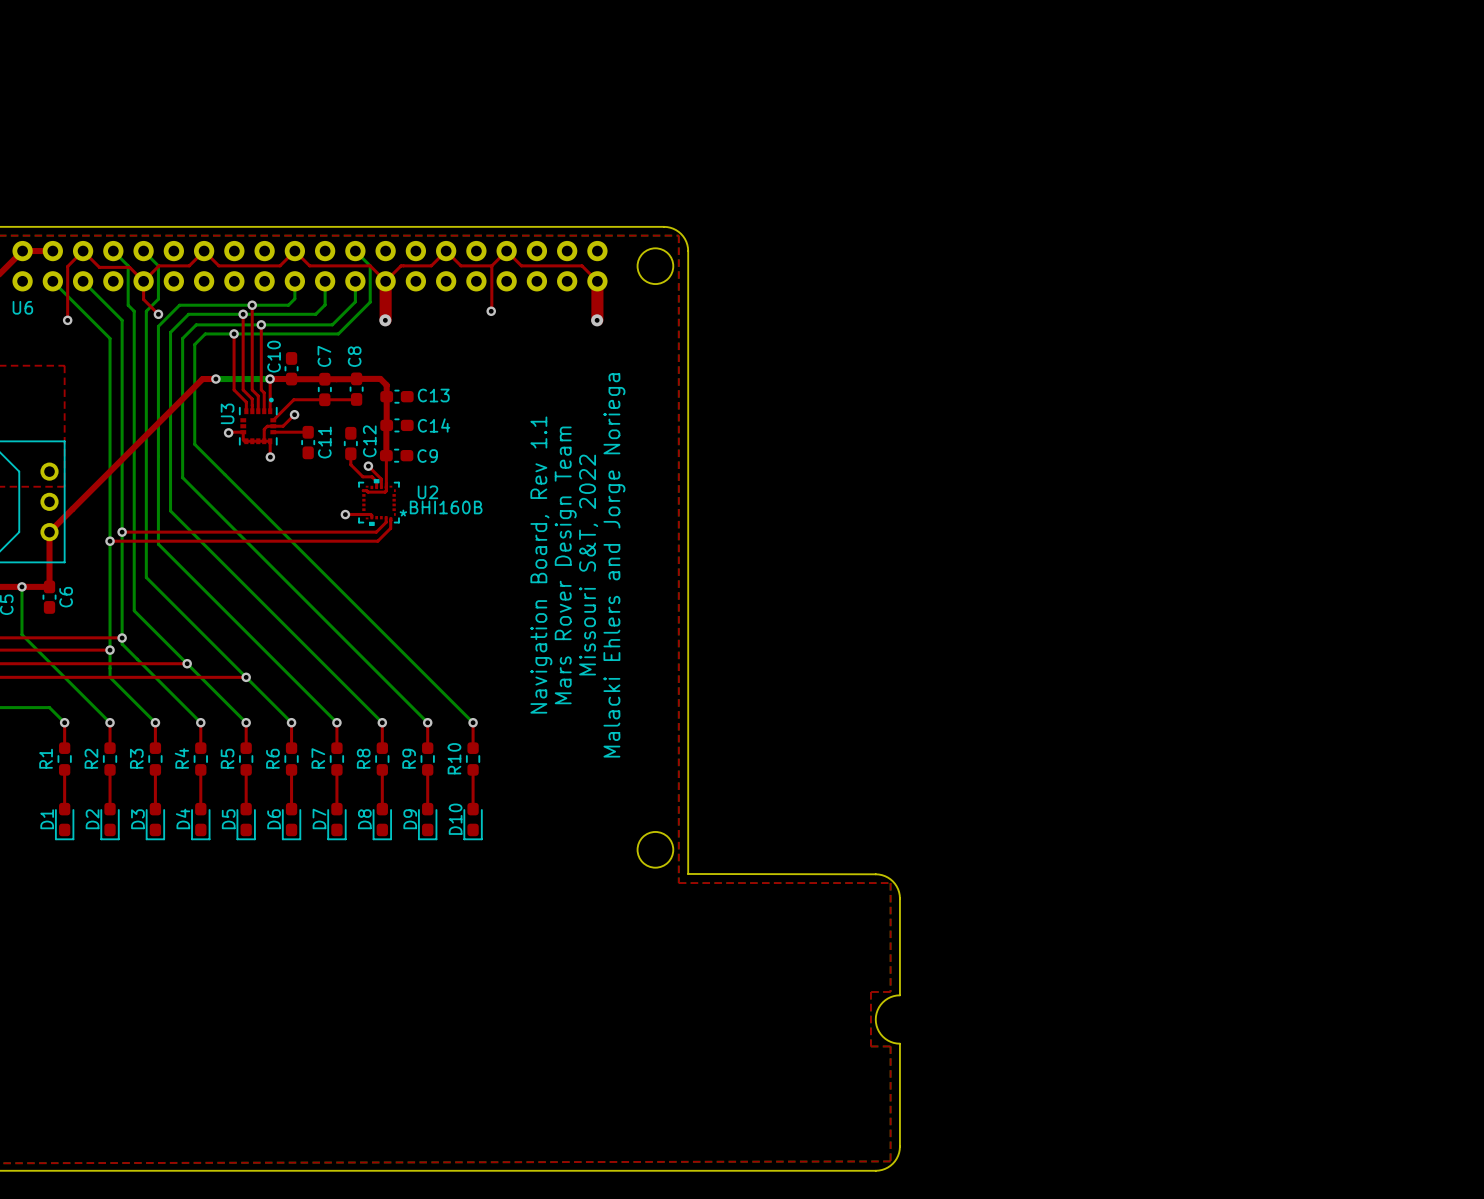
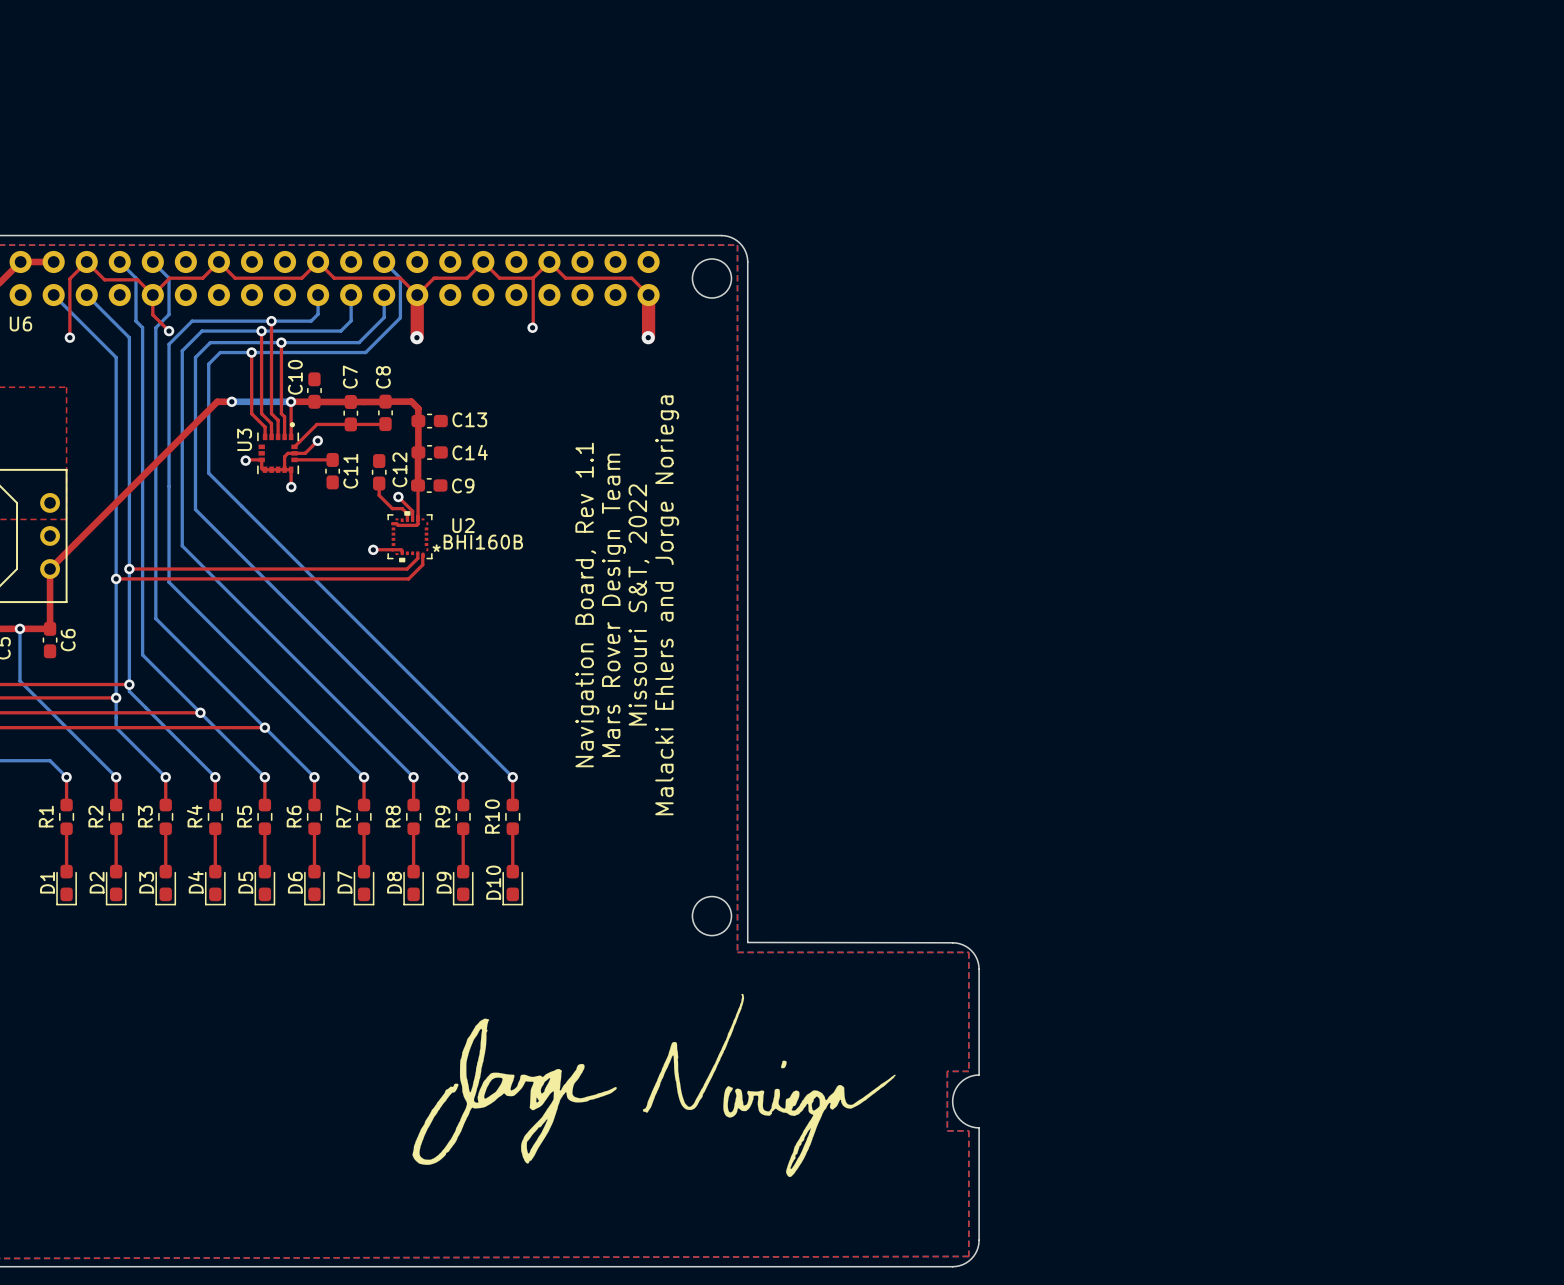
drawing: none -> [412, 993, 896, 1178]

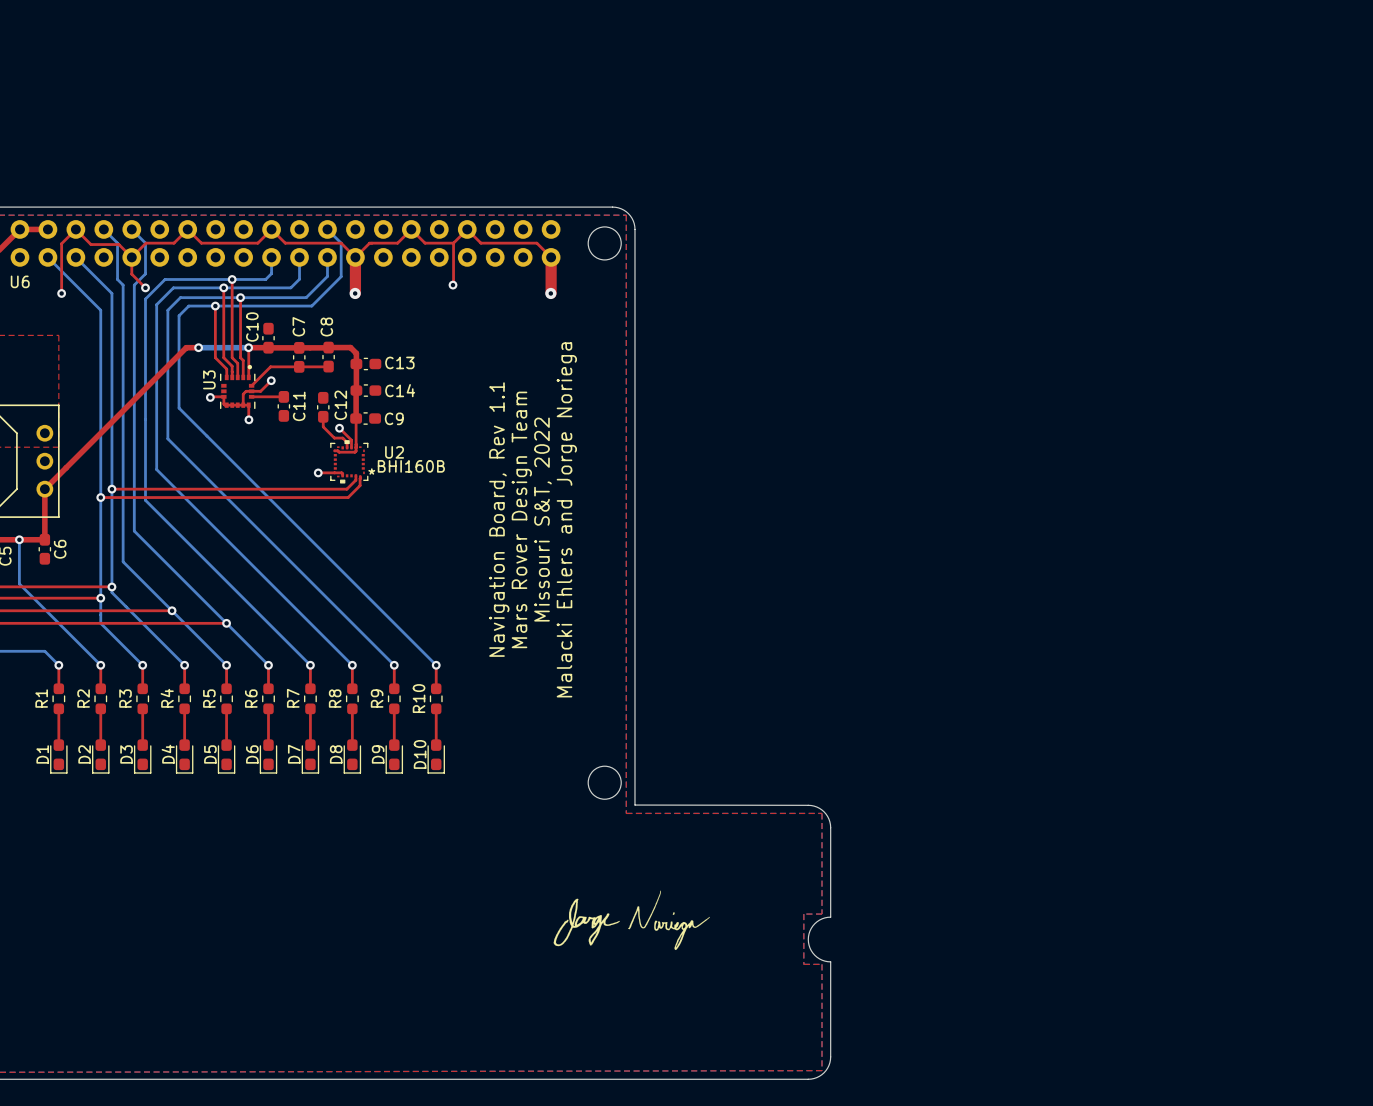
drawing: [412, 993, 896, 1178] -> none
drawing: none -> [553, 890, 710, 951]

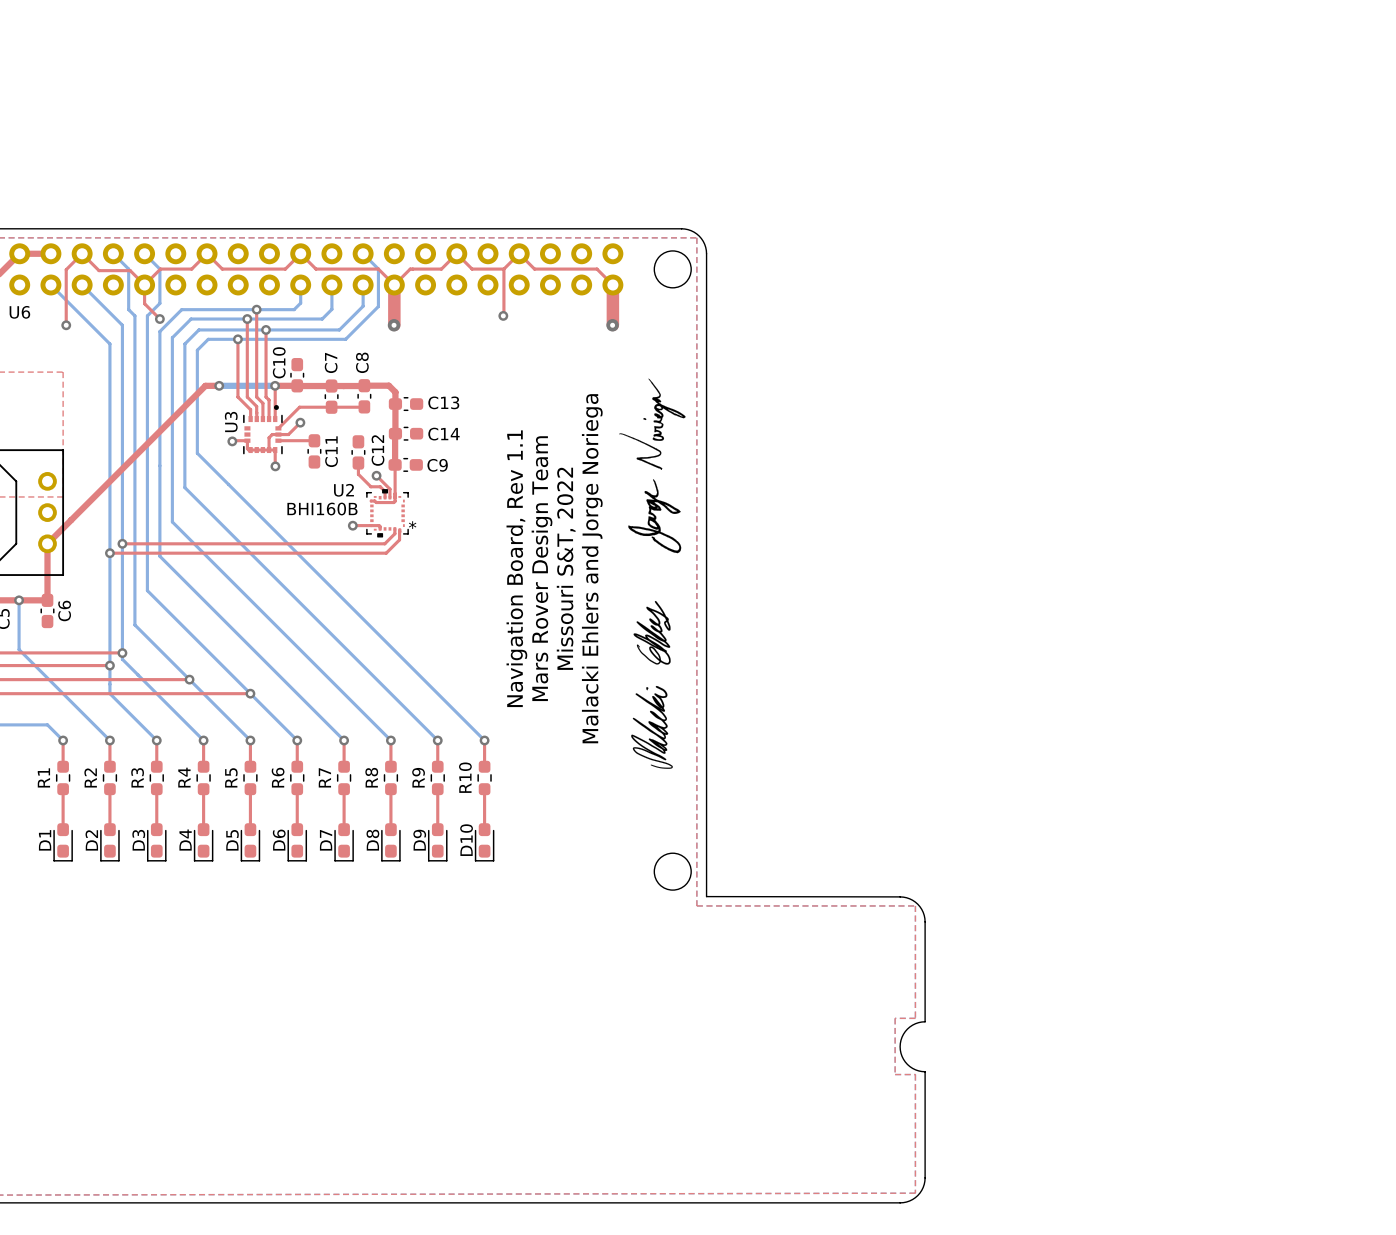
drawing: none -> [619, 378, 686, 554]
U2 name position: U2 (394, 452) -> U2 (343, 490)
U2 value position: BHI160B (411, 466) -> BHI160B (322, 509)
text position: Navigation Board, Rev 1.1 (499, 519) -> Navigation Board, Rev 1.1 (516, 568)
text position: Mars Rover Design Team (521, 519) -> Mars Rover Design Team (542, 568)
text position: Missouri S&T, 2022 (543, 519) -> Missouri S&T, 2022 (566, 568)
text position: Malacki Ehlers and Jorge Noriega (566, 519) -> Malacki Ehlers and Jorge Noriega (592, 568)
drawing: none -> [631, 600, 673, 769]
drawing: [553, 890, 710, 951] -> none

